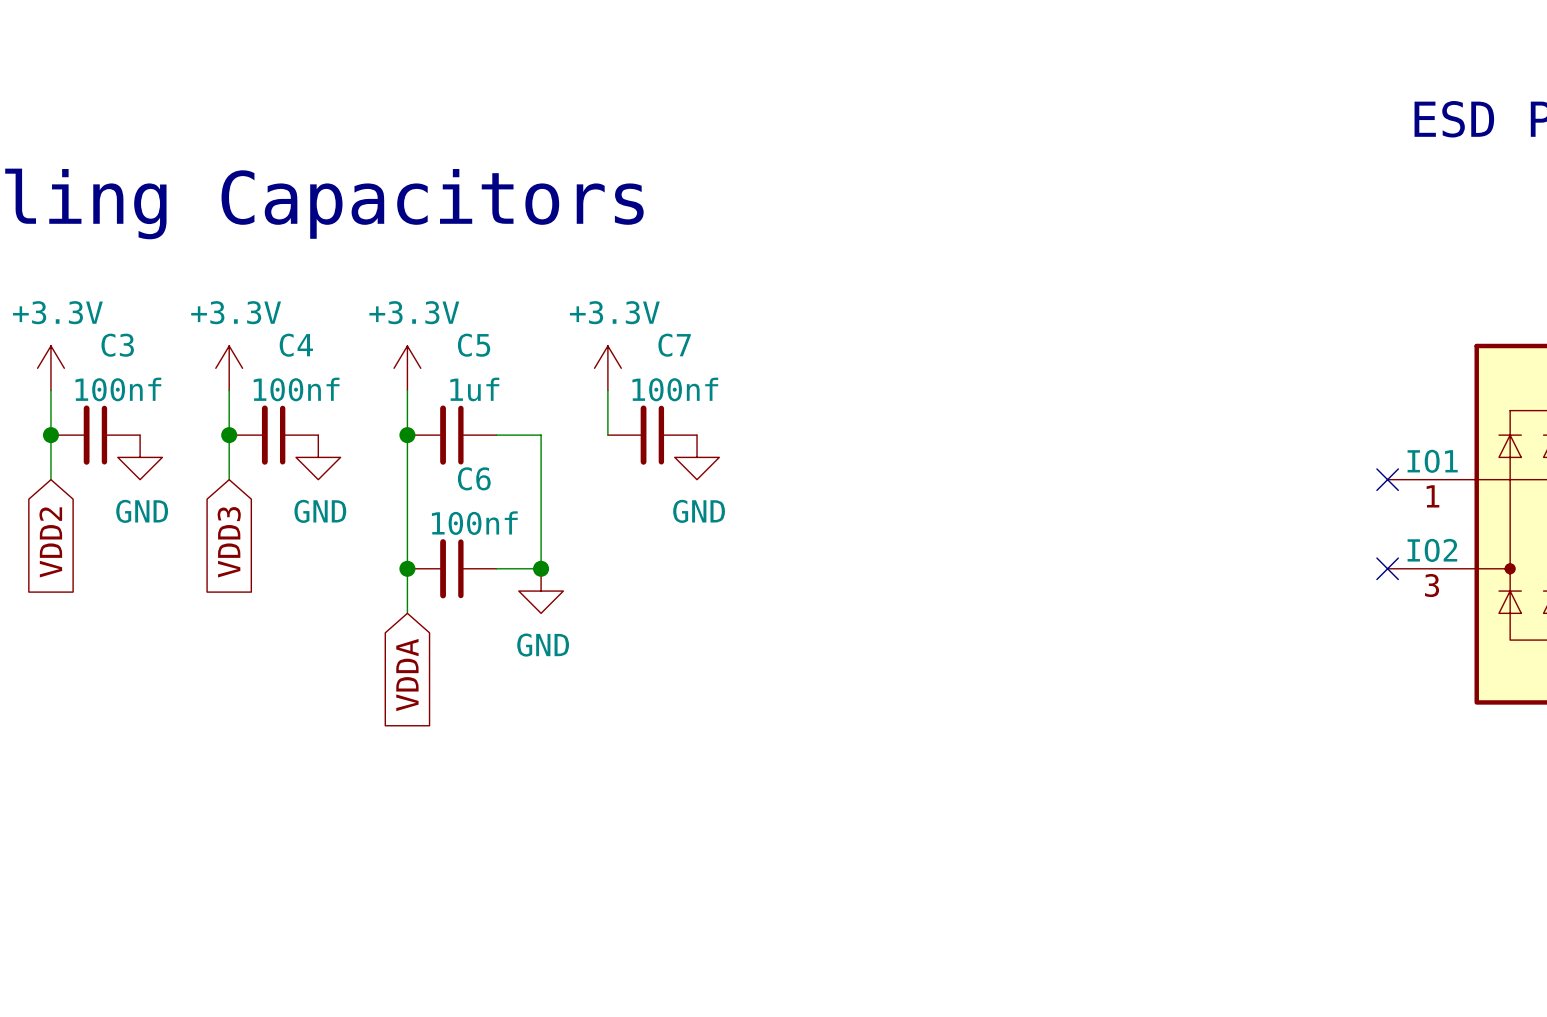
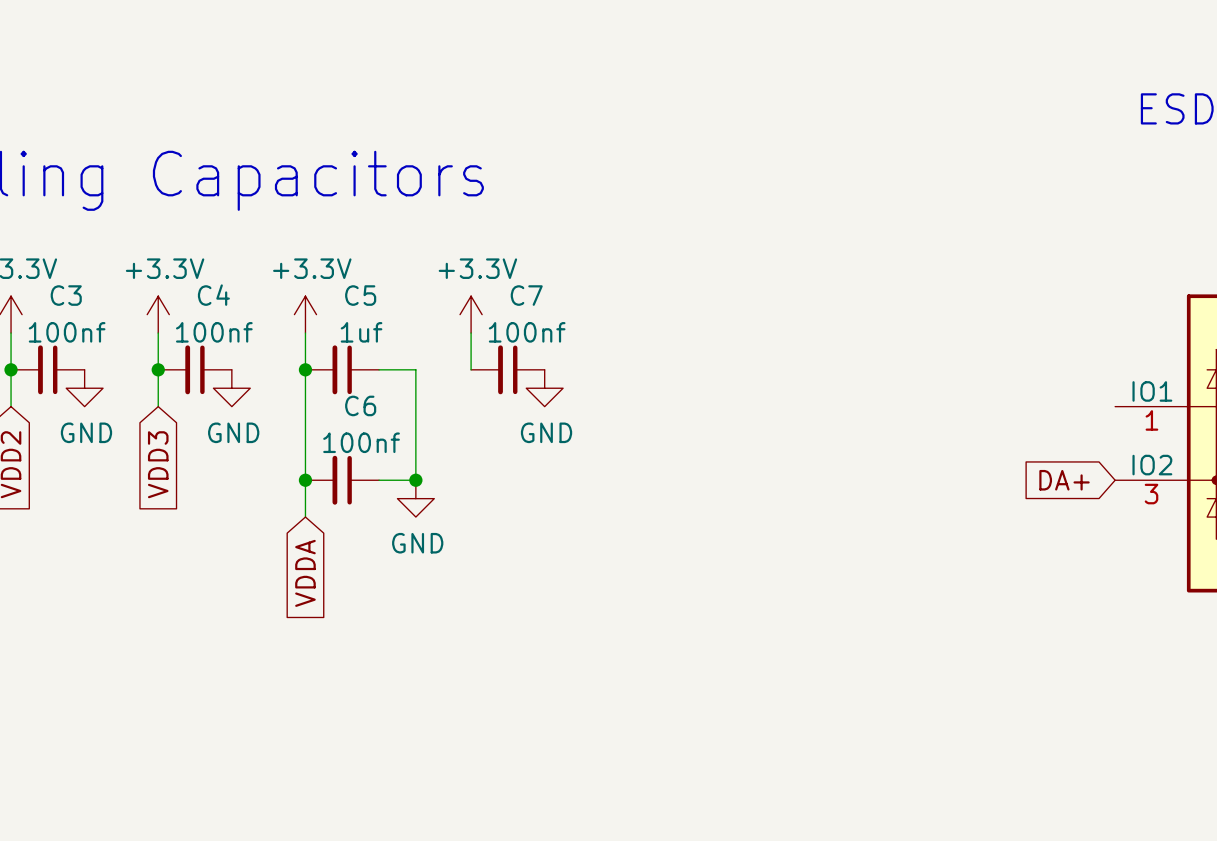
no-connect mark: (1387, 479) -> none
global label: none -> DA+ (1064, 480)
no-connect mark: (1387, 568) -> none

